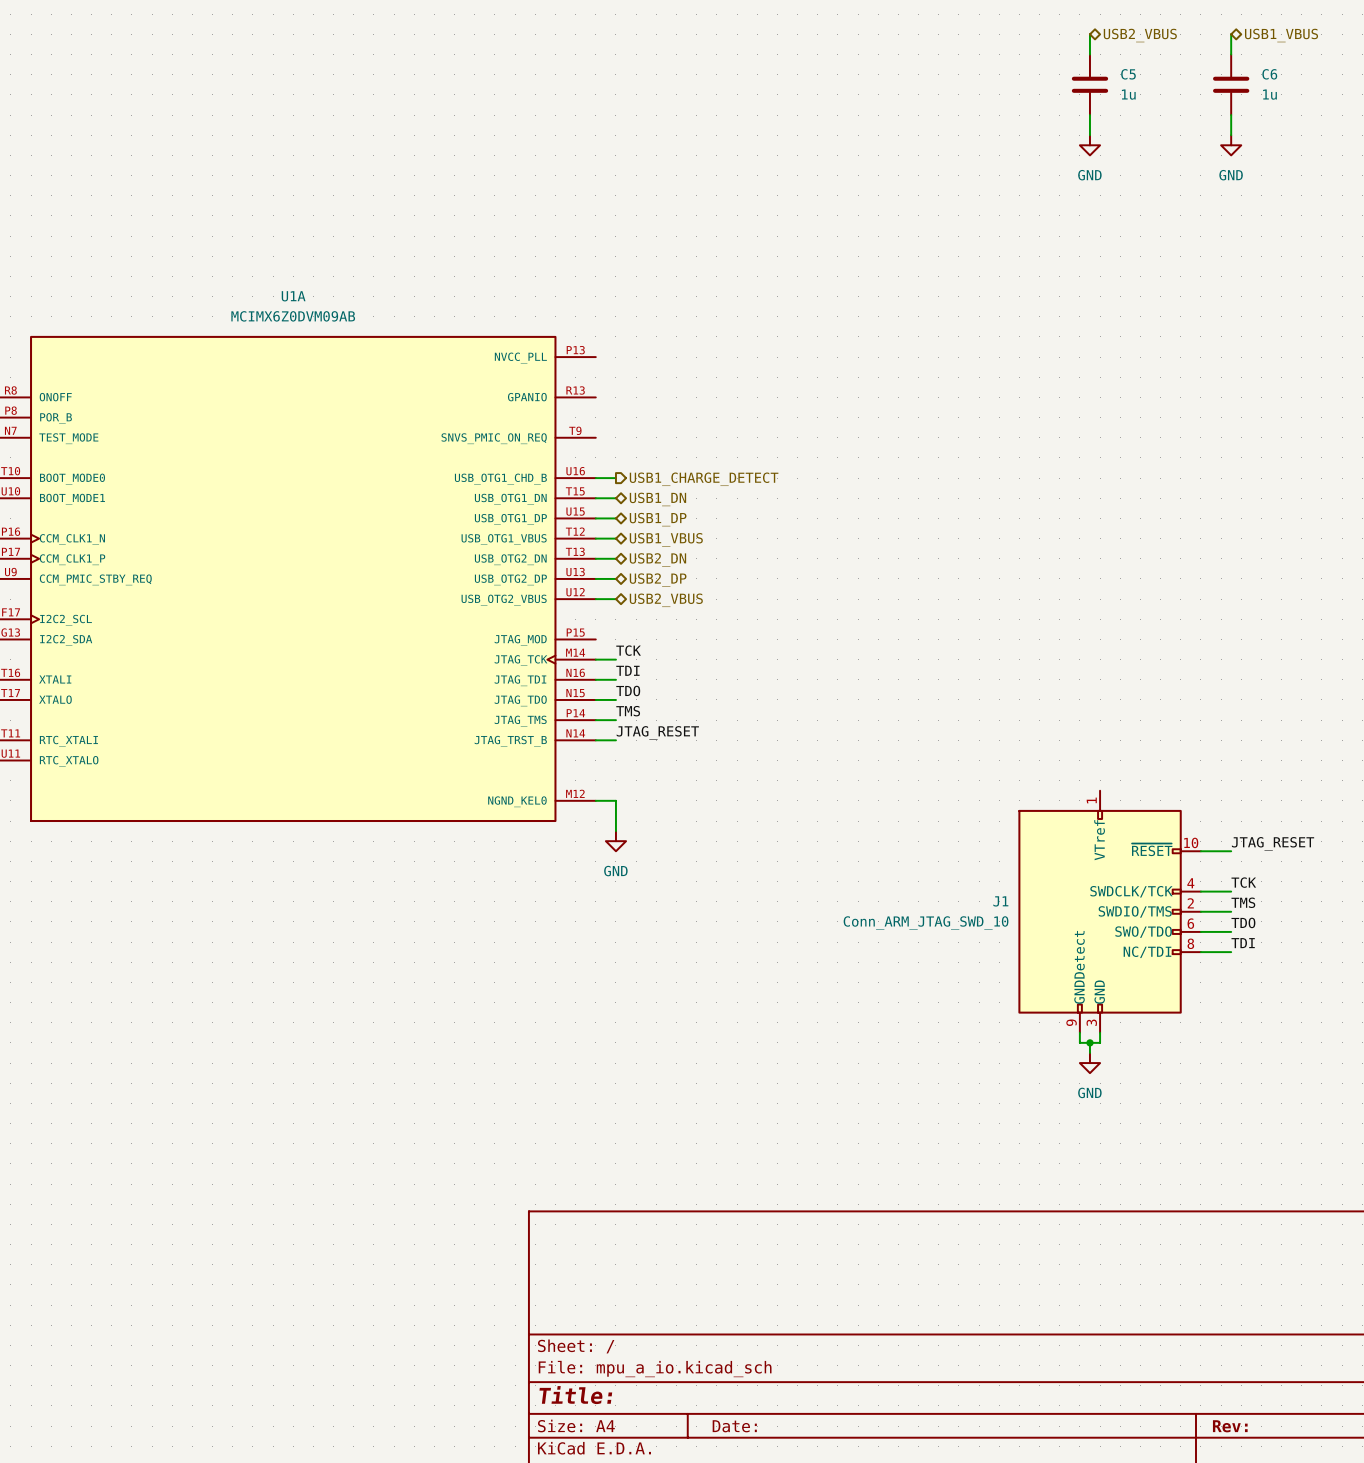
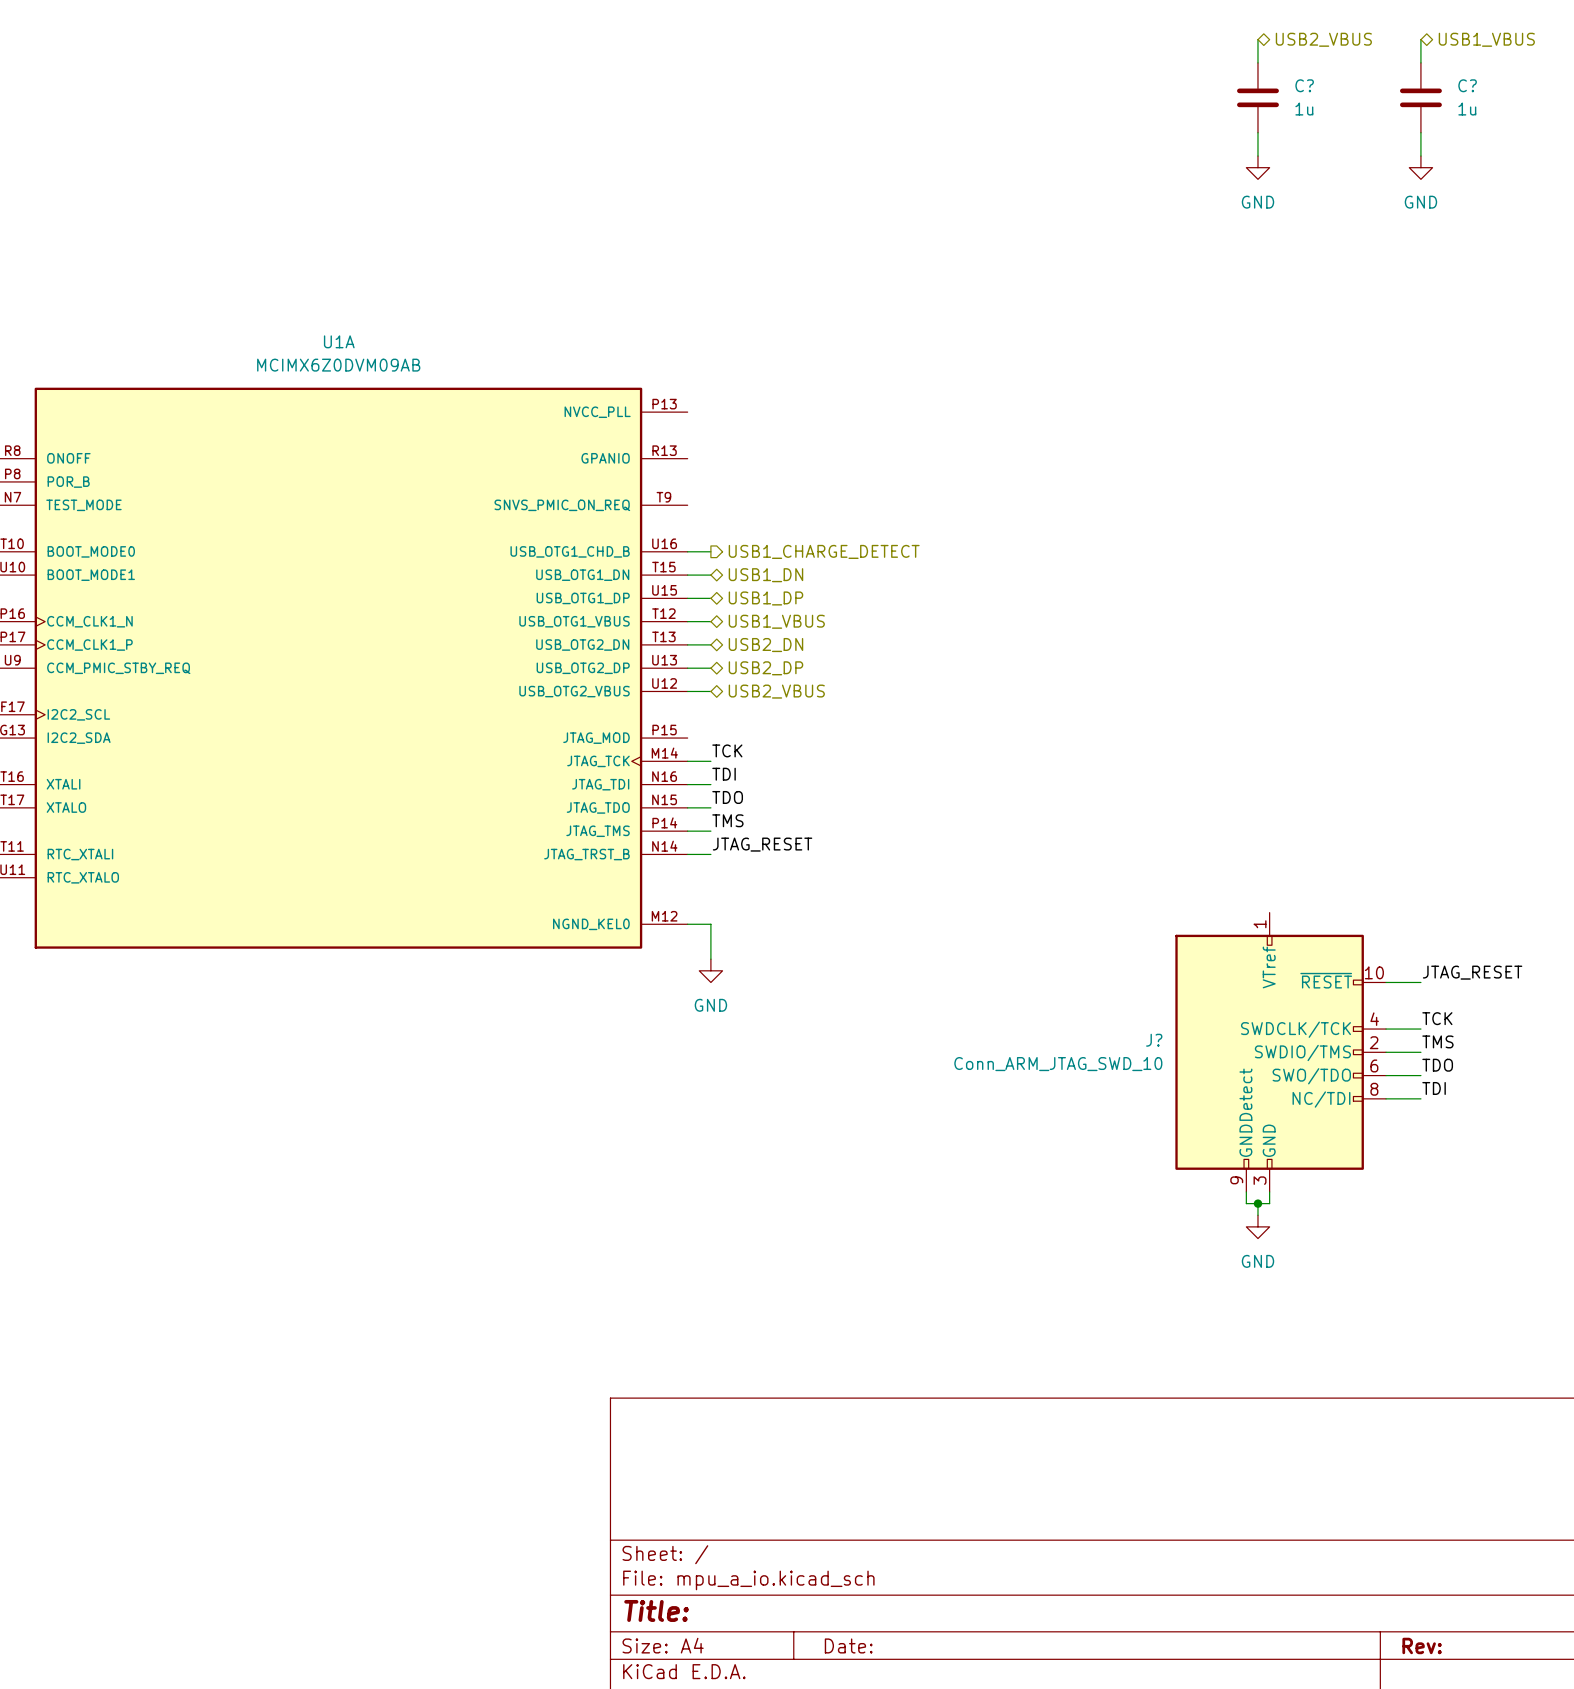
C5 name: C5 (1128, 74) -> C? (1304, 85)
C6 name: C6 (1269, 74) -> C? (1467, 85)
J1 name: J1 (1000, 901) -> J? (1154, 1040)

